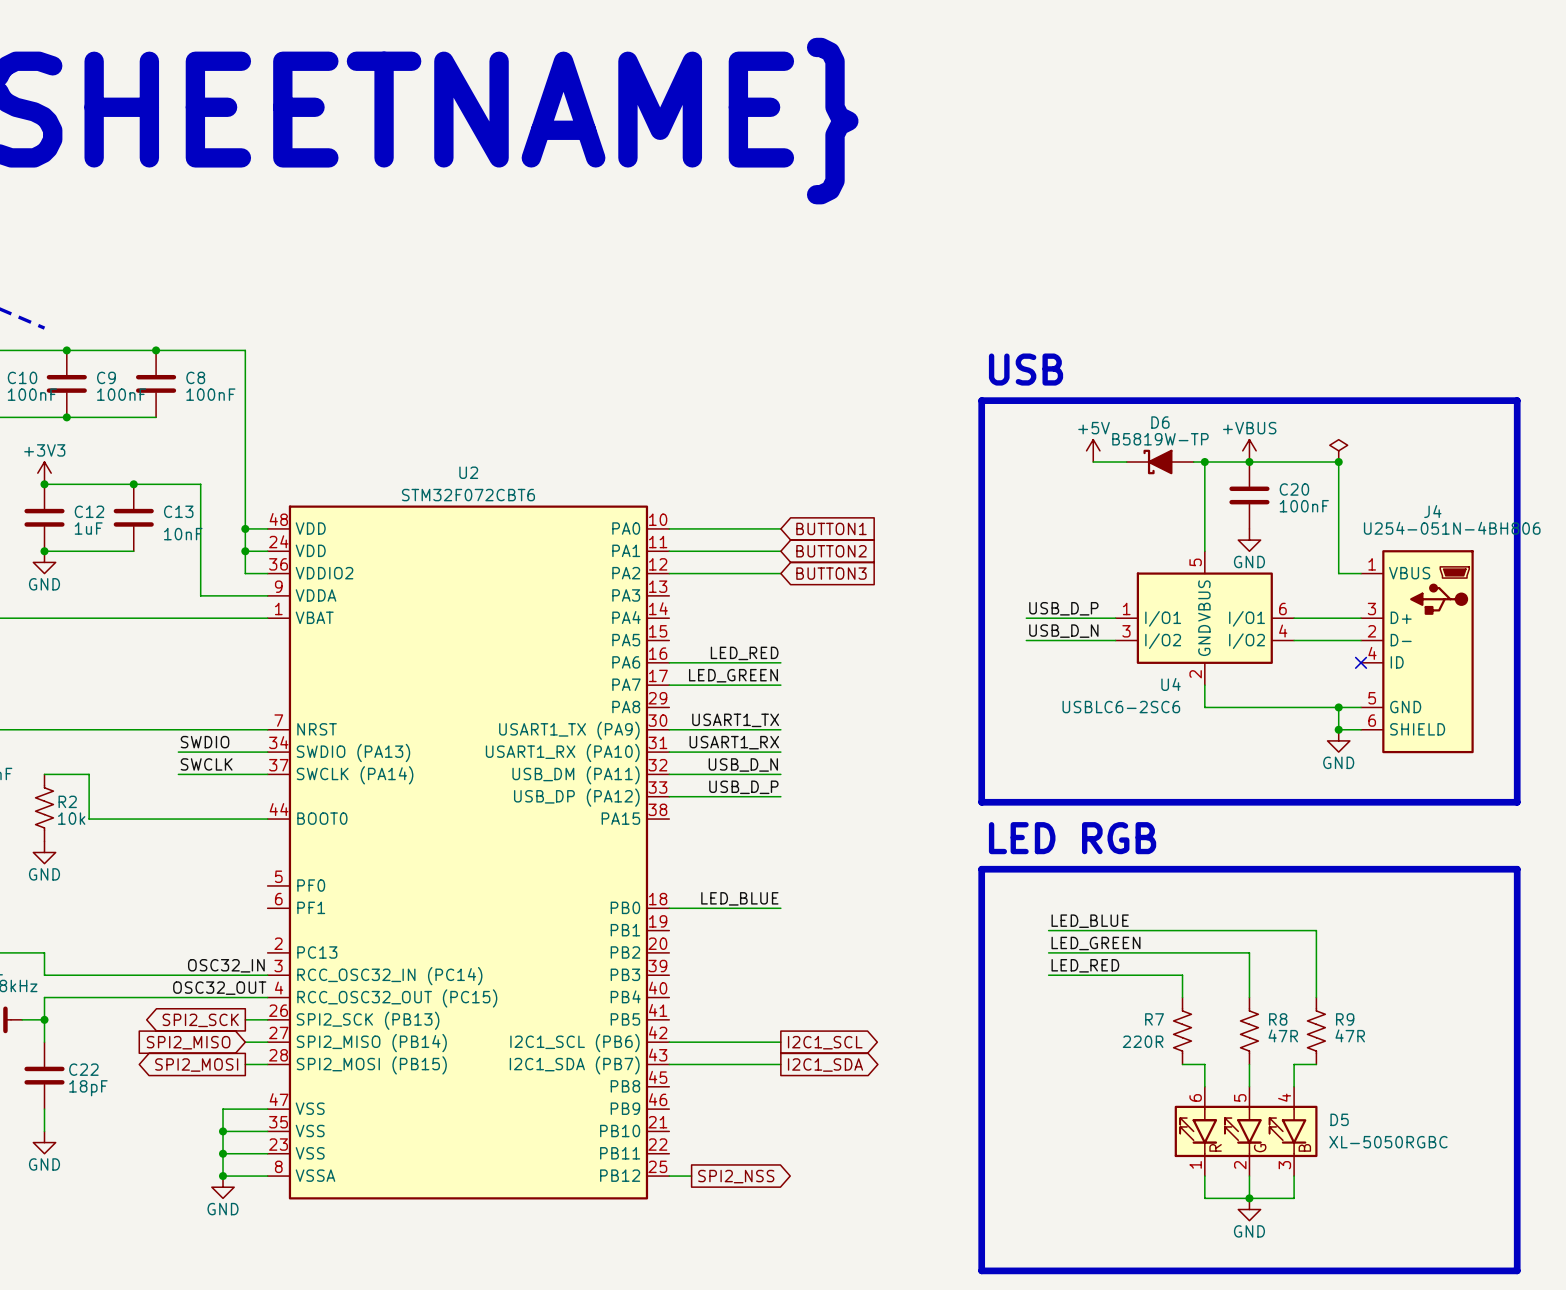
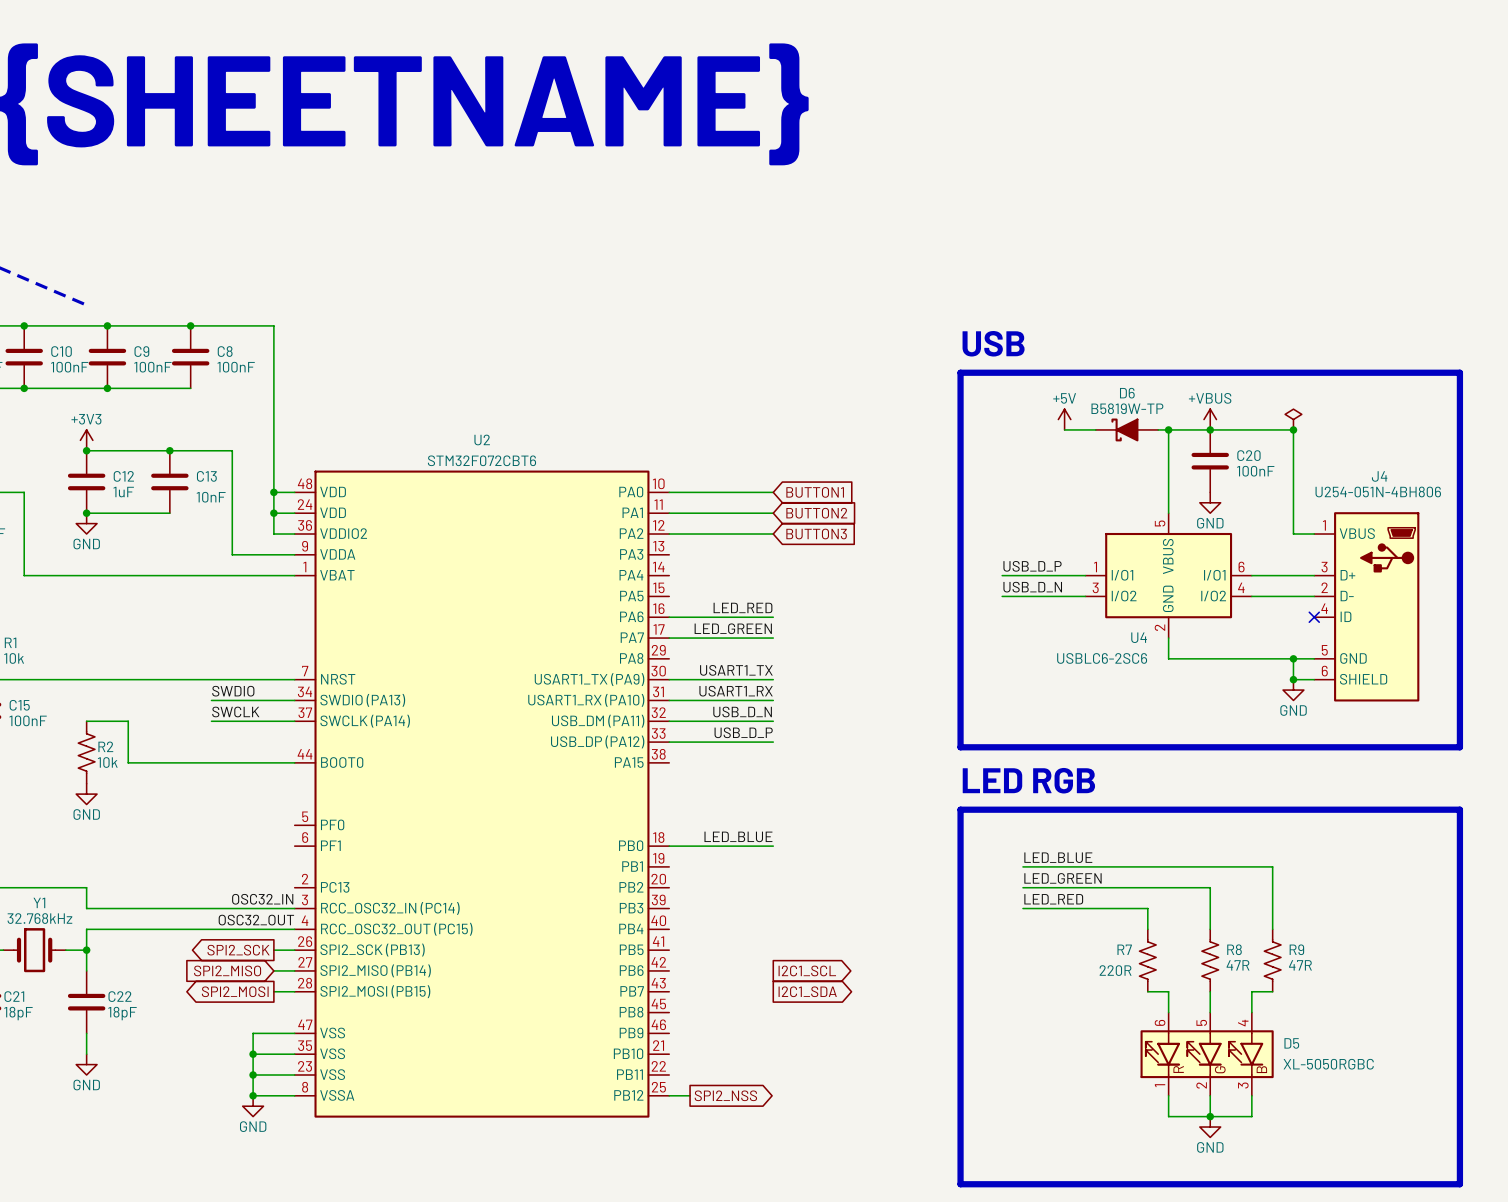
wire: (669, 1042) (780, 1042) -> none
U2 pin name: I2C1_SCL (PB6) (574, 1043) -> PB6 (631, 970)
wire: (669, 1064) (780, 1064) -> none
U2 pin name: I2C1_SDA (PB7) (574, 1065) -> PB7 (632, 991)

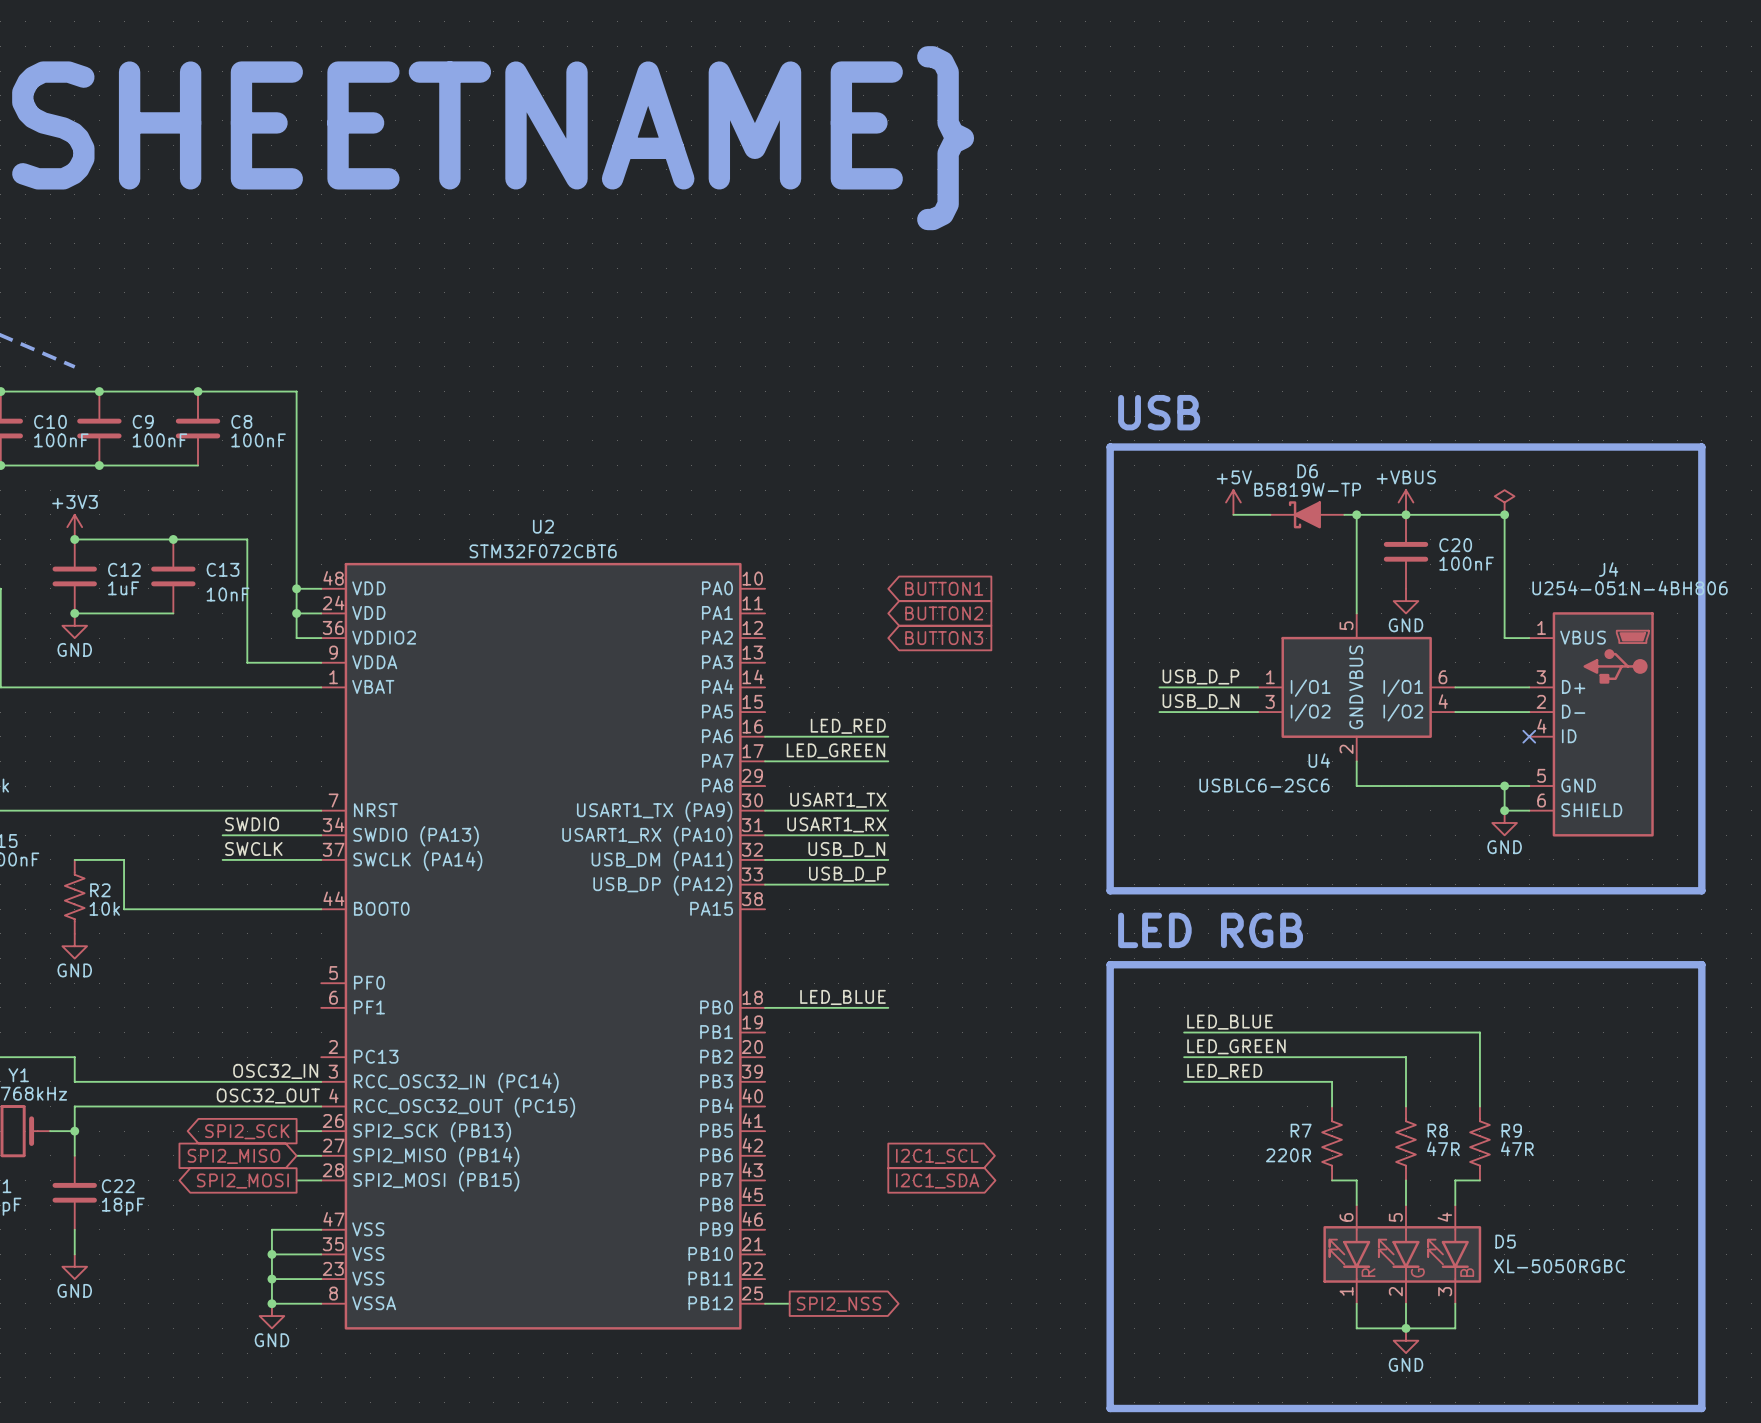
wire: (669, 492) (773, 492) -> none
wire: (669, 513) (773, 513) -> none
wire: (669, 534) (773, 534) -> none

